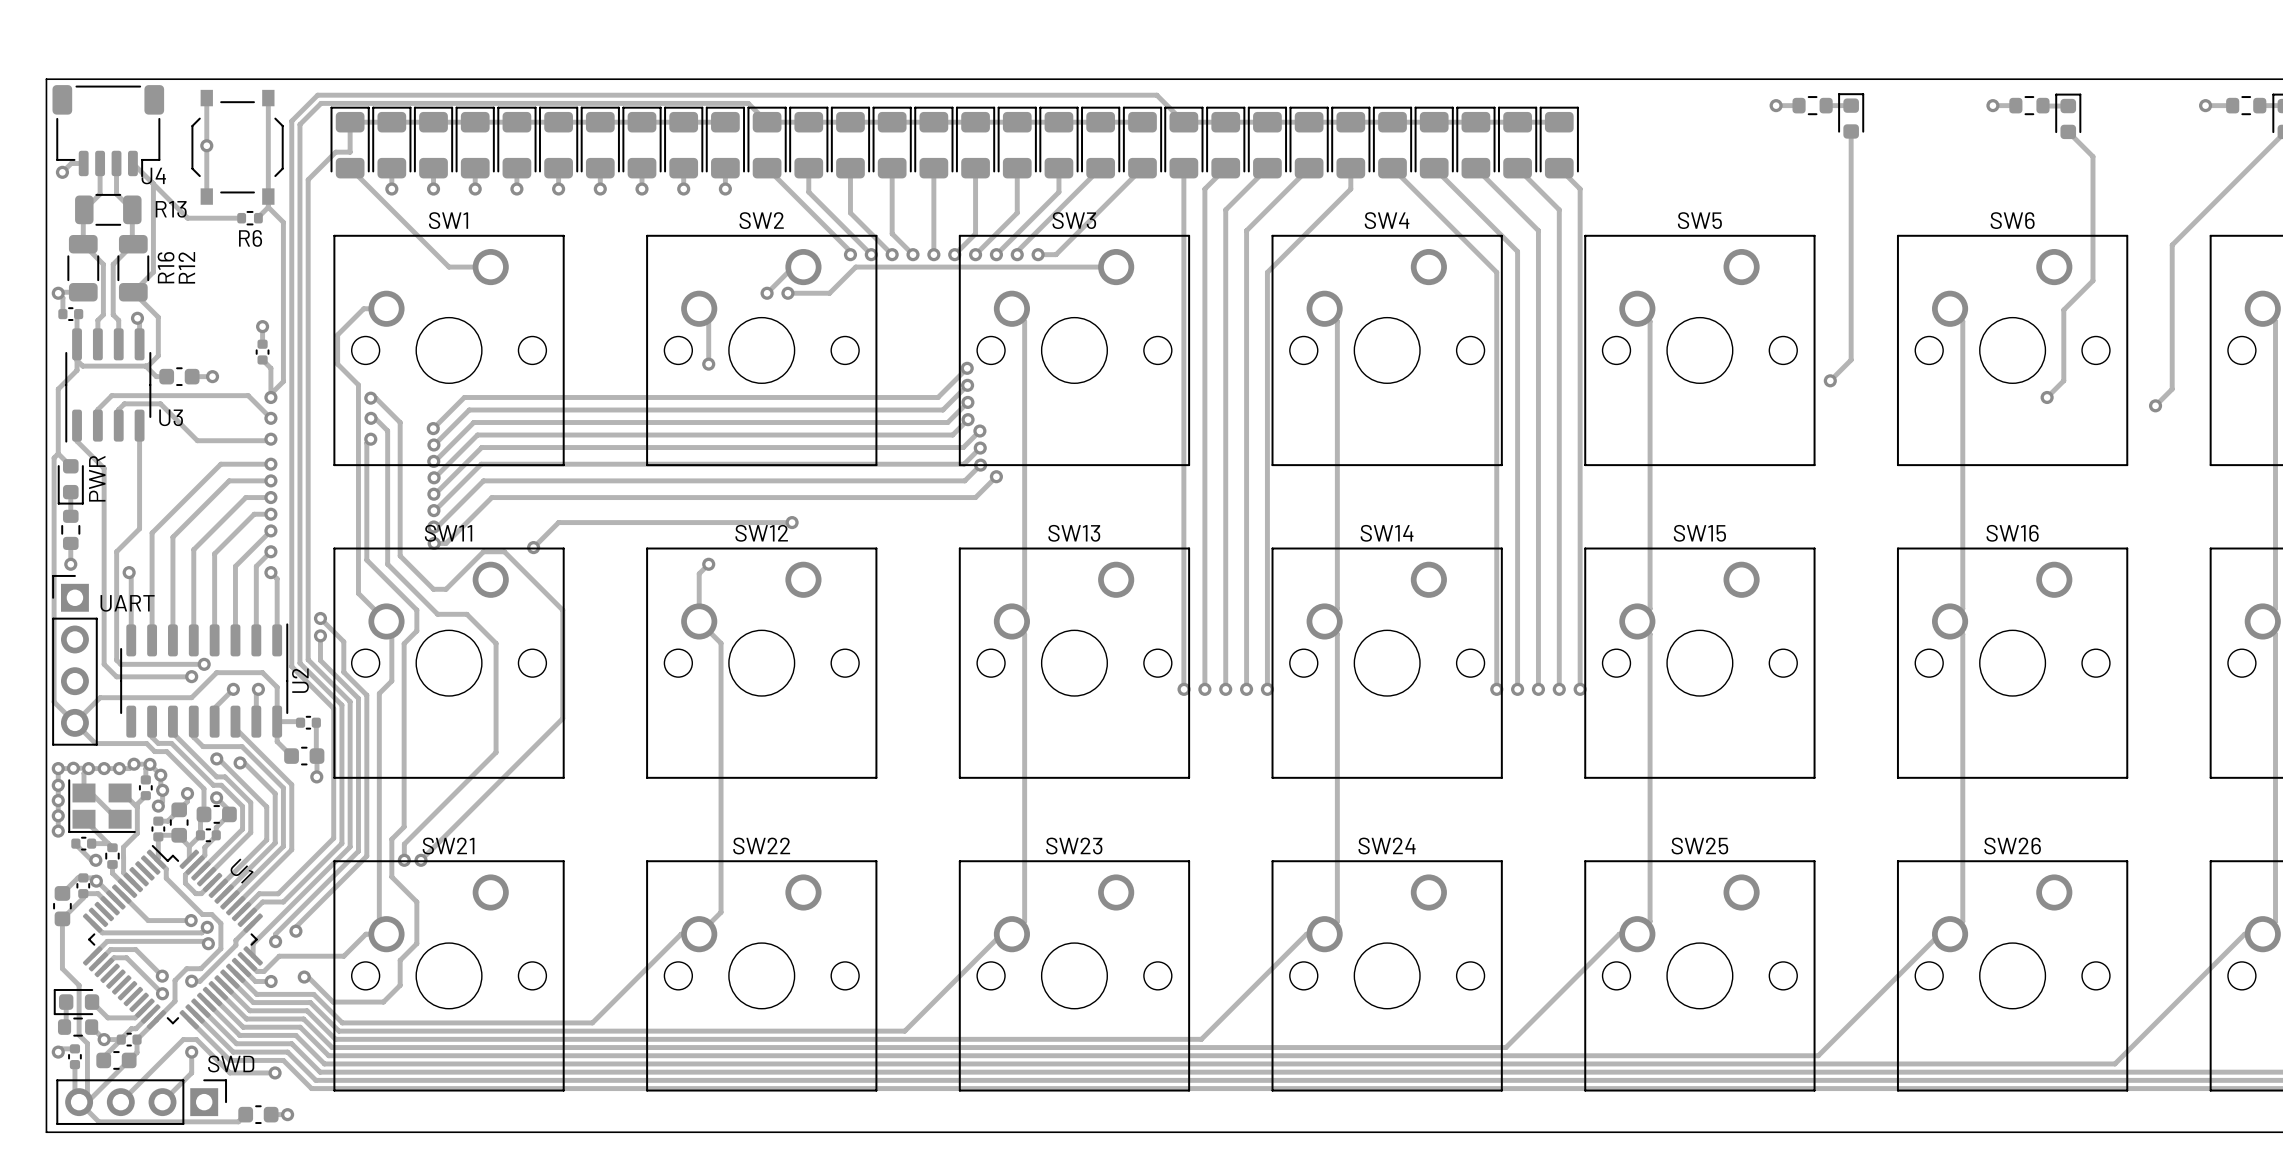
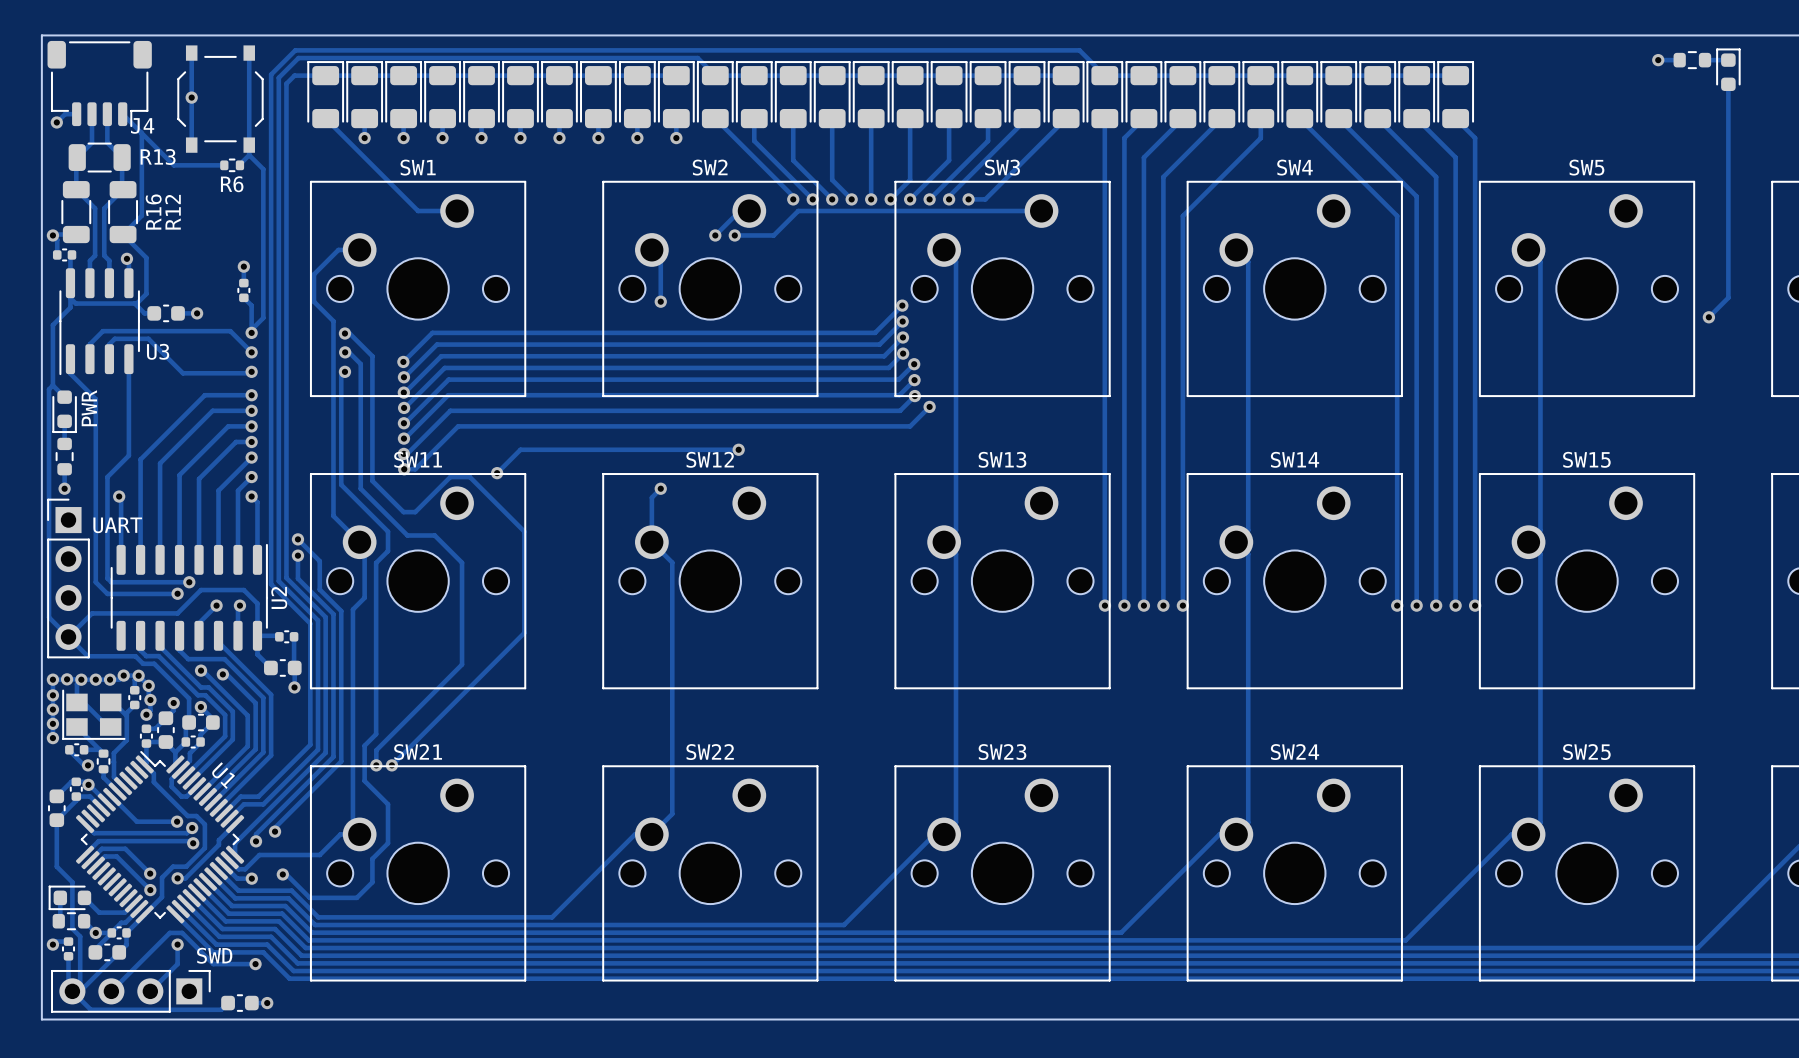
track: (350, 122) (350, 152) (335, 152) (308, 179) -> (325, 75) (294, 75) (286, 83) (286, 129)

